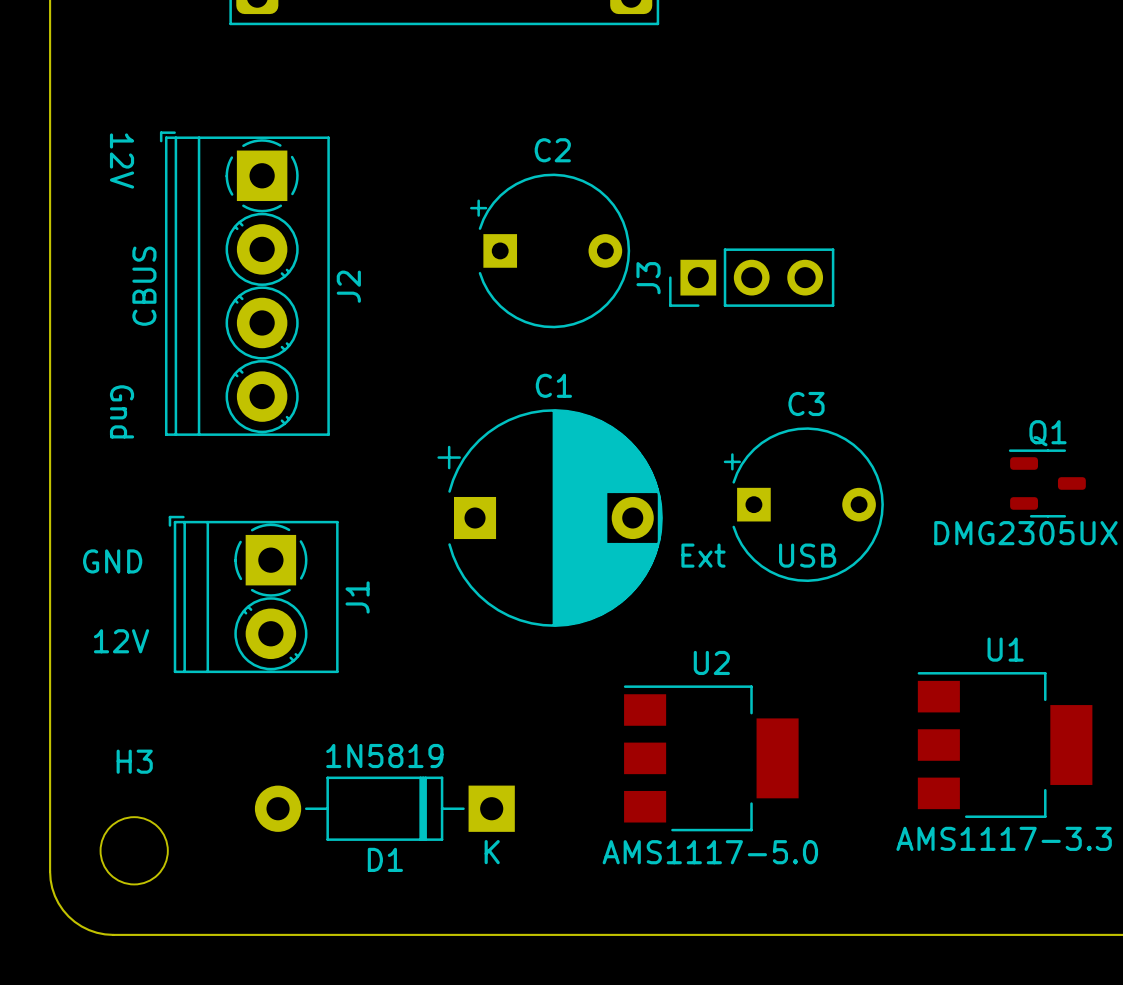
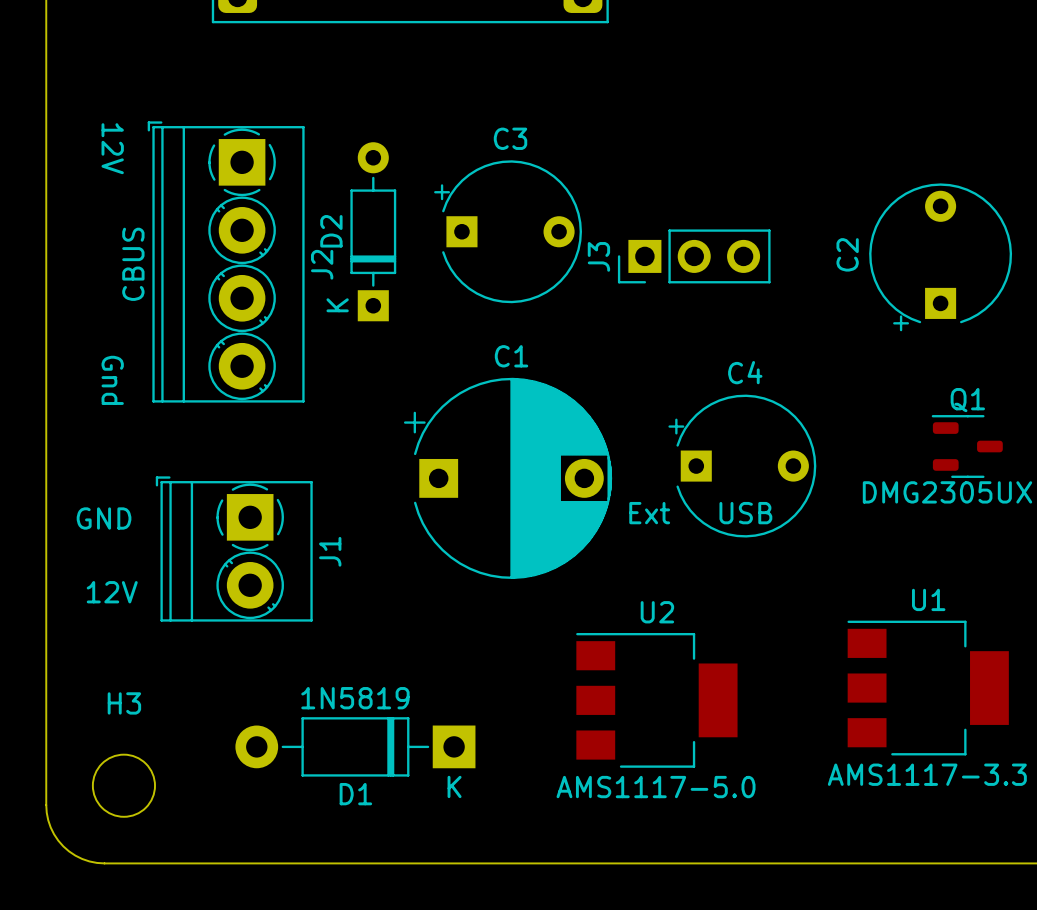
C2 name: C2 (552, 150) -> C3 (510, 138)
D2: none -> (373, 231)
C2: none -> (940, 257)
C3 name: C3 (806, 403) -> C4 (745, 372)

